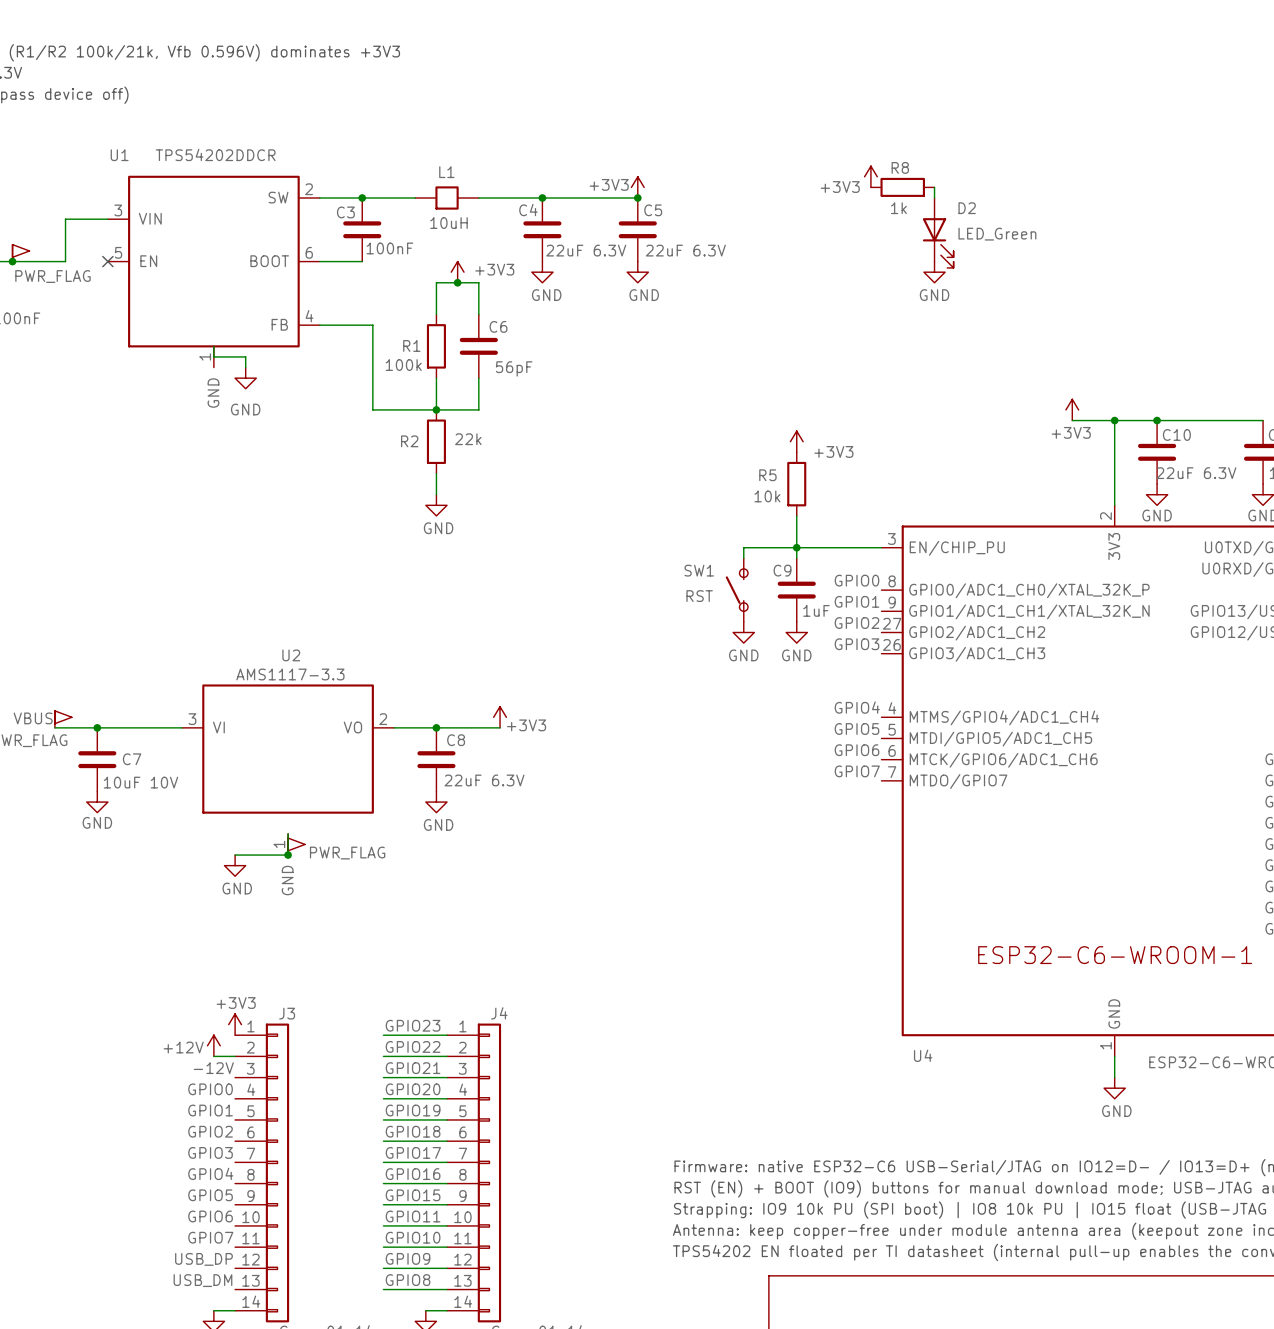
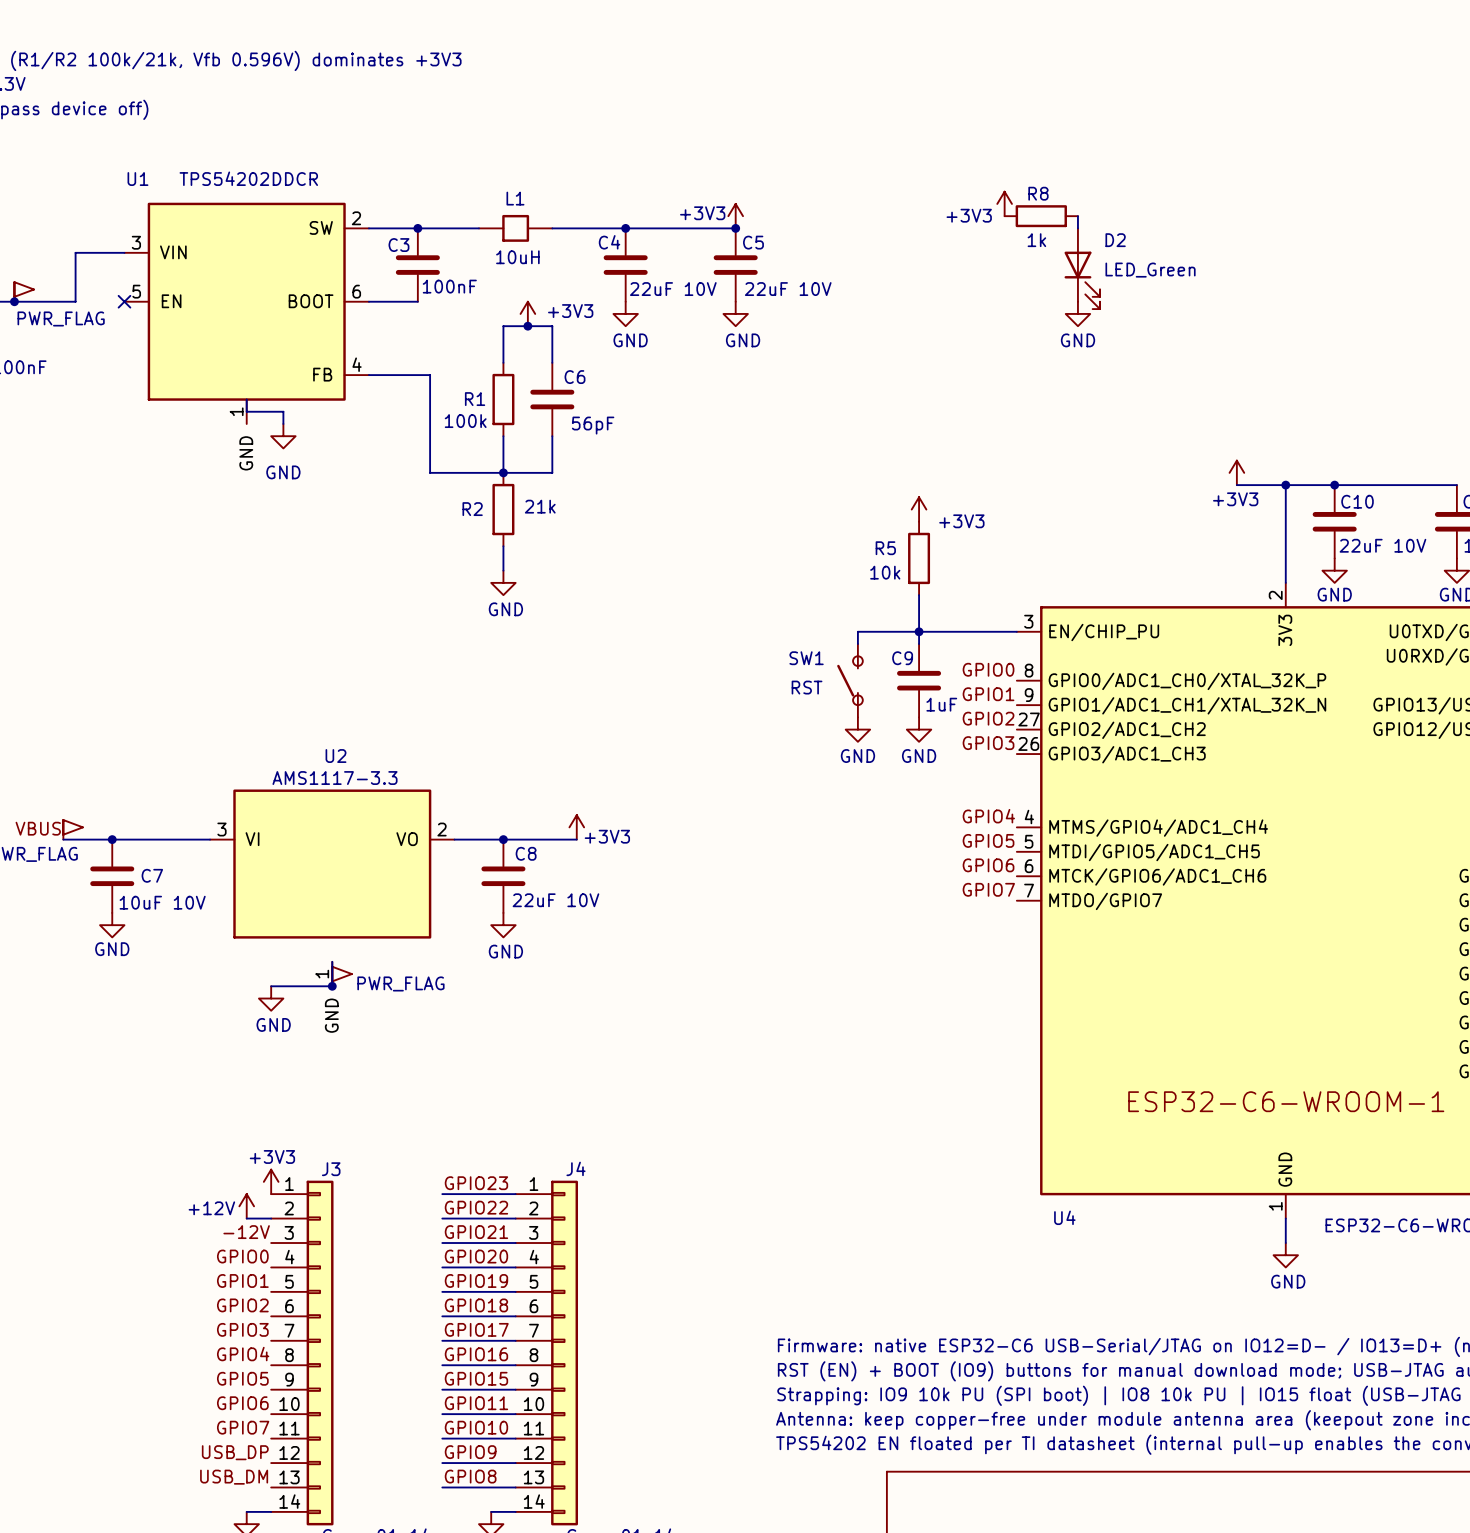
C4 value: 22uF 6.3V (586, 250) -> 22uF 10V (673, 289)
C5 value: 22uF 6.3V (685, 250) -> 22uF 10V (788, 289)
R2 value: 22k (468, 439) -> 21k (540, 506)
C10 value: 22uF 6.3V (1196, 473) -> 22uF 10V (1382, 545)
C8 value: 22uF 6.3V (484, 780) -> 22uF 10V (555, 900)

